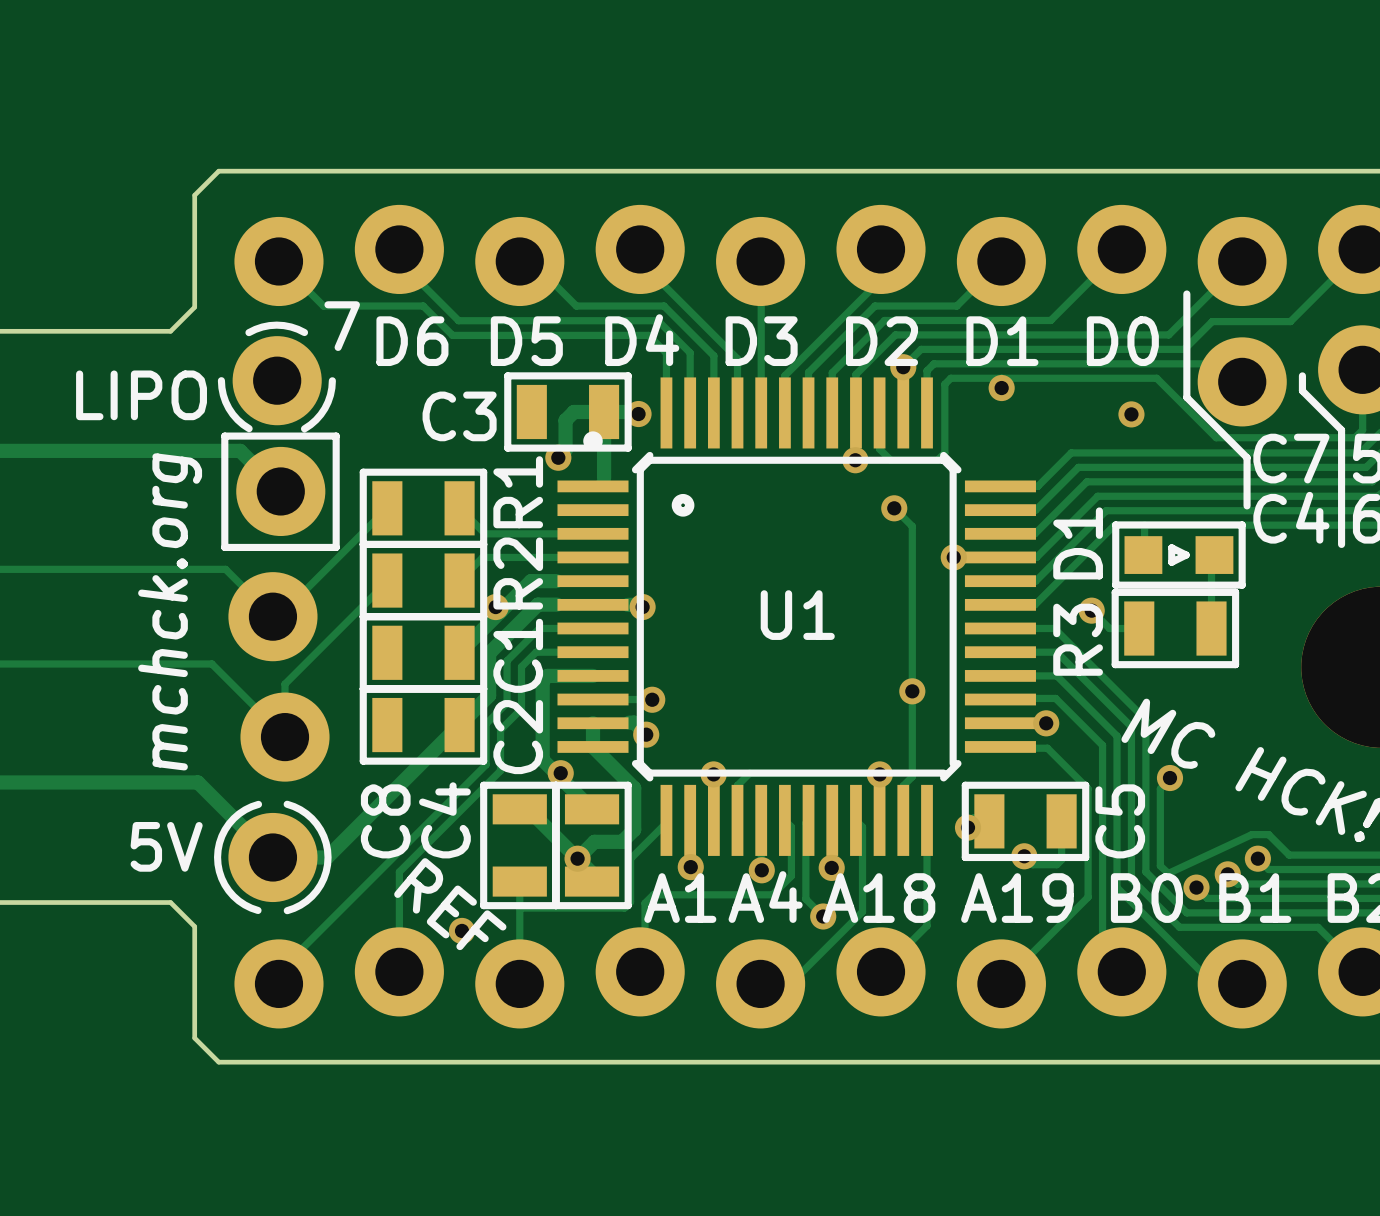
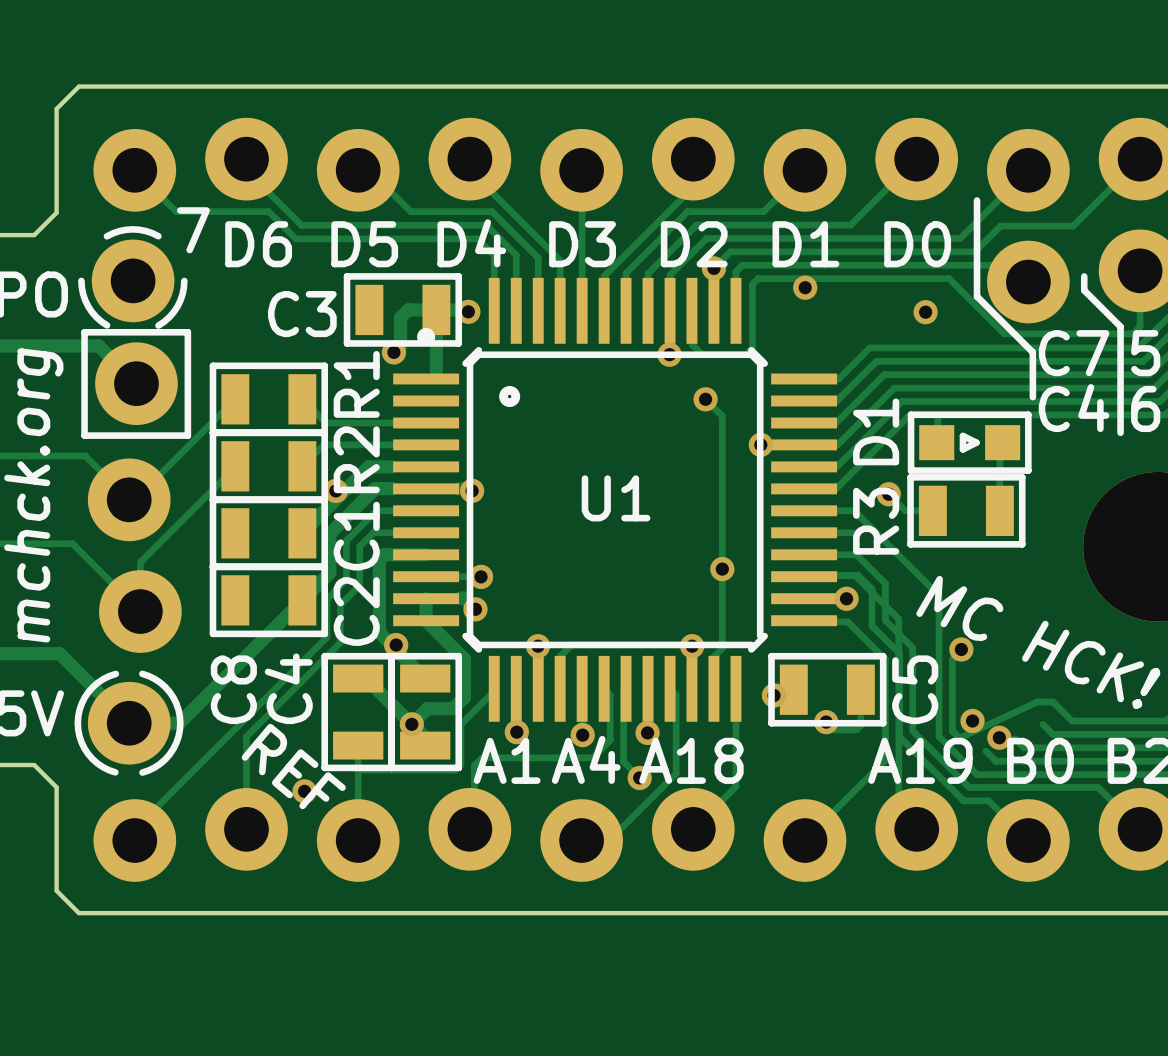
track: (1053, 652) (1056, 652) (1131, 726) (1131, 879) (1179, 927) (1318, 927) -> (885, 583) (885, 620) (912, 647) (912, 731) (969, 787) (1098, 787)
track: (1088, 707) (1117, 736) (1117, 887) (1213, 983) (1242, 983) -> (805, 575) (858, 575) (872, 589) (872, 626) (899, 653) (899, 736) (963, 800) (988, 800) (1028, 840)
via: none -> (972, 721)
via: (1257, 858) -> none
via: none -> (999, 737)
via: (1227, 874) -> none
via: (1196, 887) -> none
text position: A19 (1017, 898) -> A19 (920, 760)
text: B0 (1146, 898) -> none
text: B1 (1255, 898) -> B0 (1040, 760)

